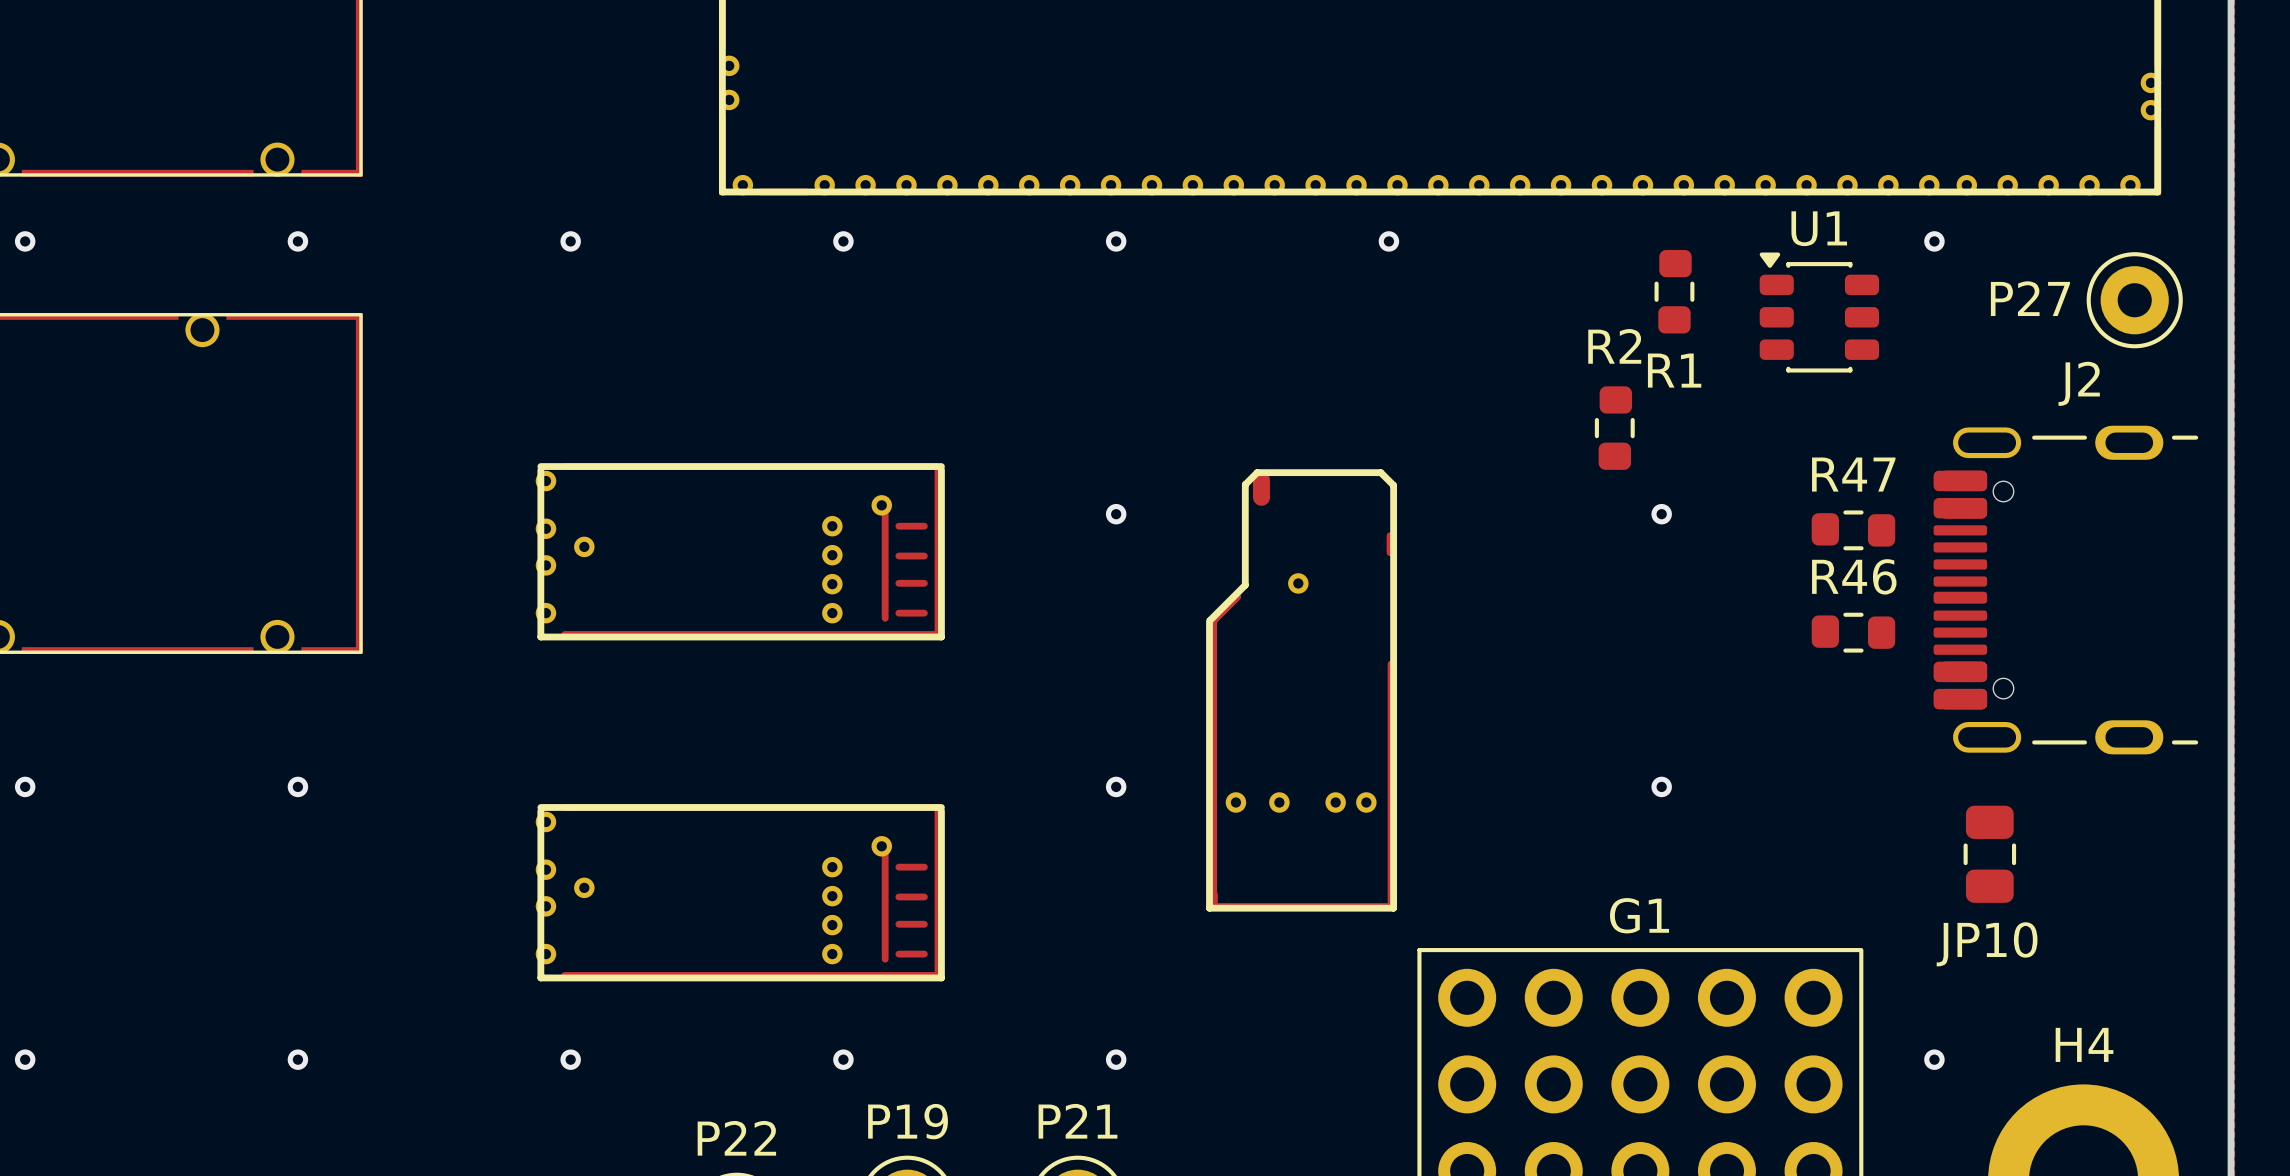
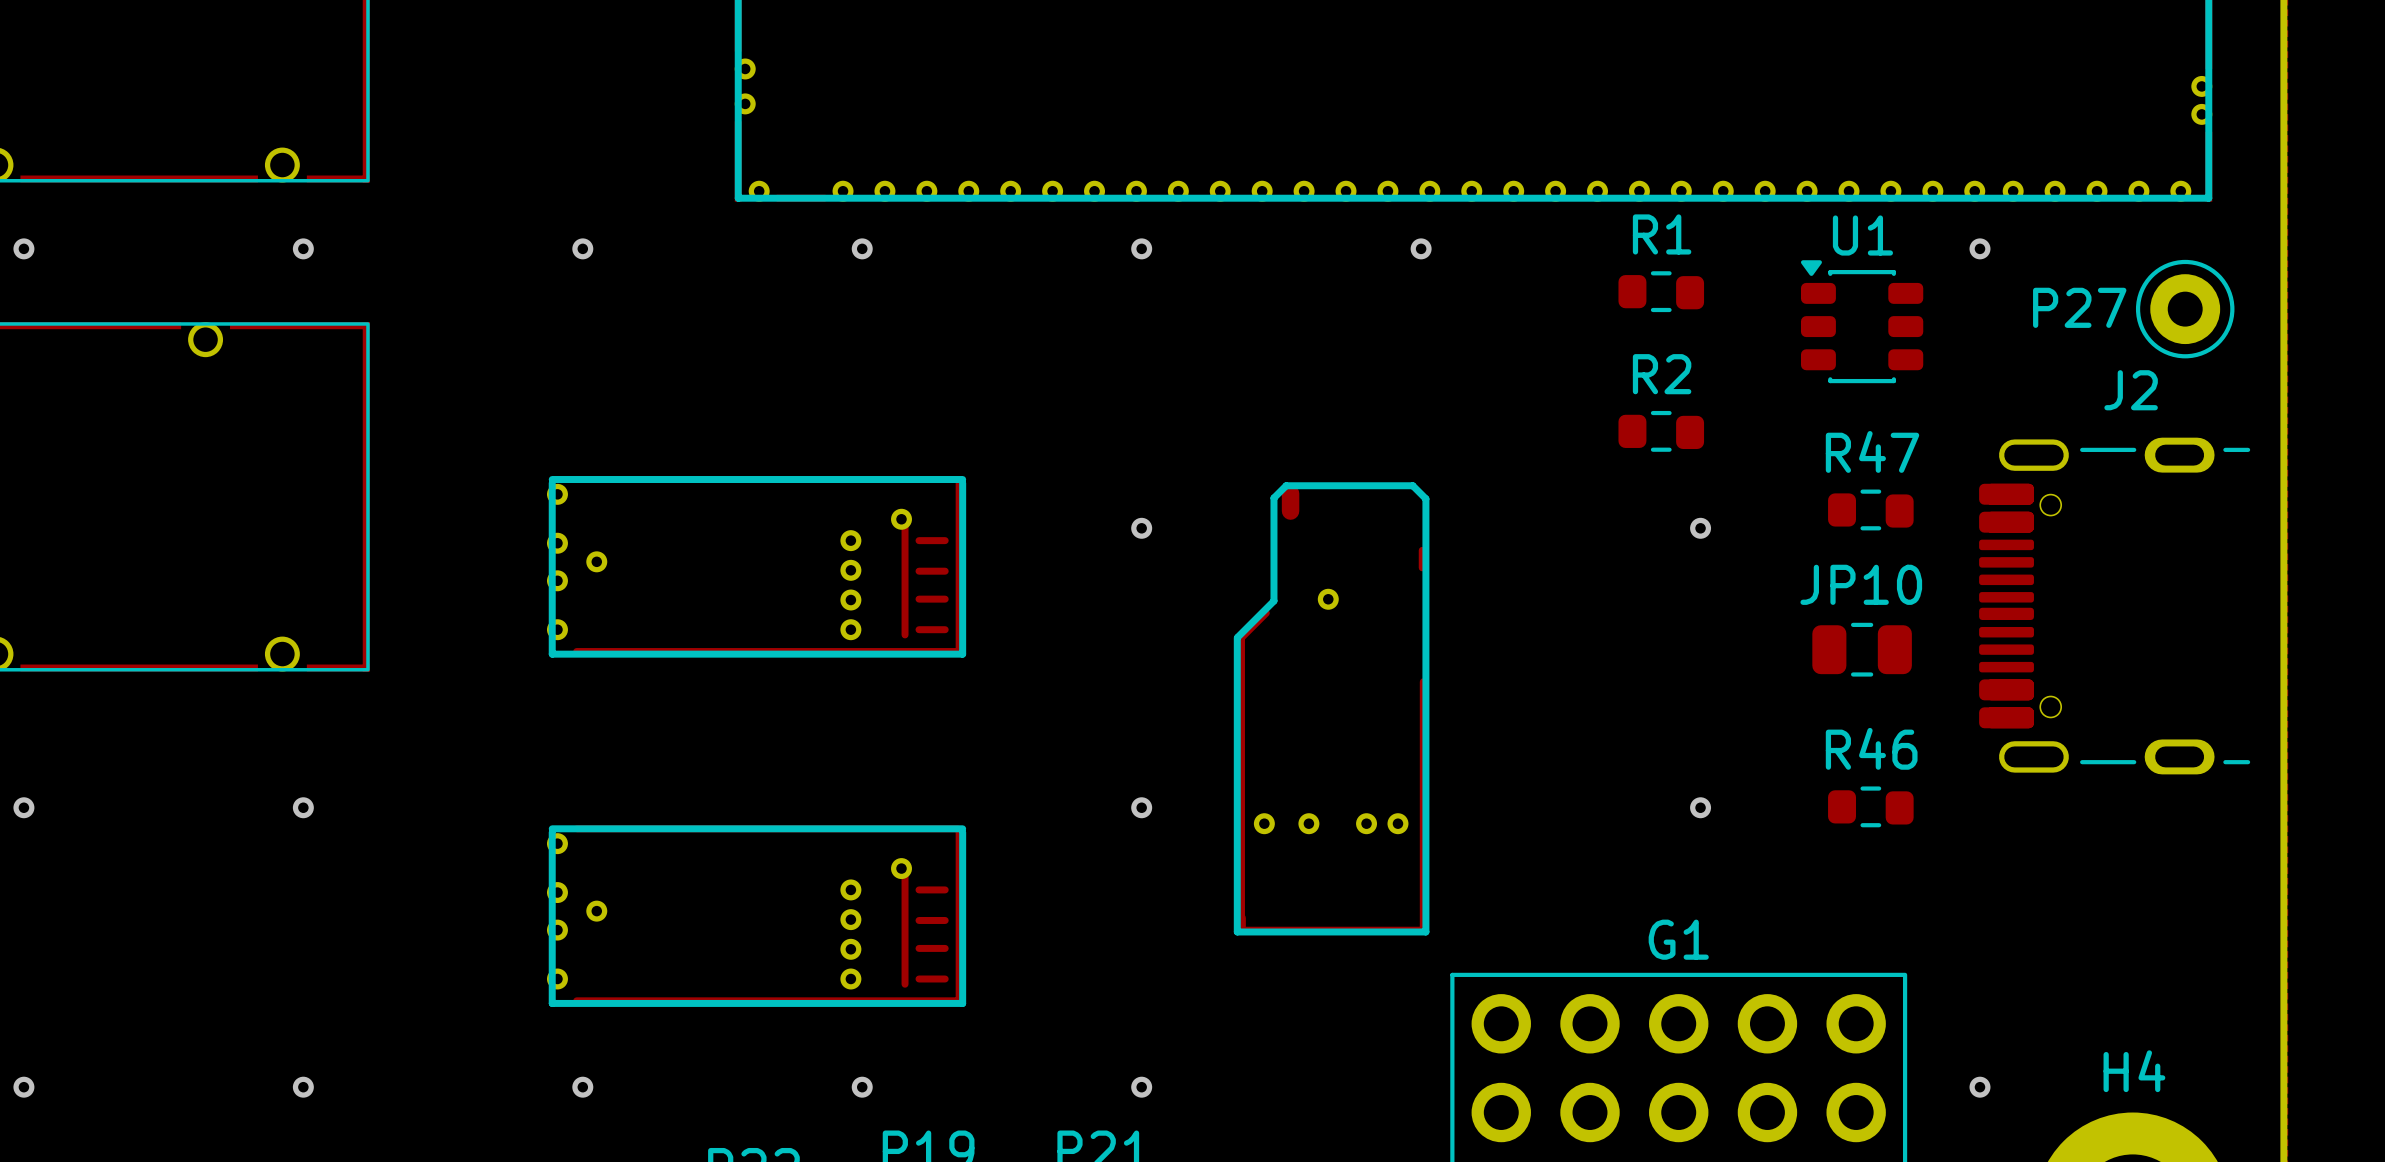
R1 rotation: 0° (1674, 291) -> 90° clockwise (1661, 291)
R1 position: (1674, 291) -> (1661, 291)
R1 name position: R1 (1674, 370) -> R1 (1662, 234)
R2 rotation: 0° (1614, 428) -> 90° clockwise (1661, 431)
R47 rotation: 0° (1853, 530) -> 180° (1870, 509)
R46 rotation: 0° (1853, 632) -> 180° (1870, 806)
R46 position: (1853, 632) -> (1870, 806)
JP10 rotation: 0° (1989, 854) -> 90° clockwise (1862, 649)
JP10 position: (1989, 854) -> (1862, 649)
JP10 name position: JP10 (1987, 944) -> JP10 (1861, 584)

